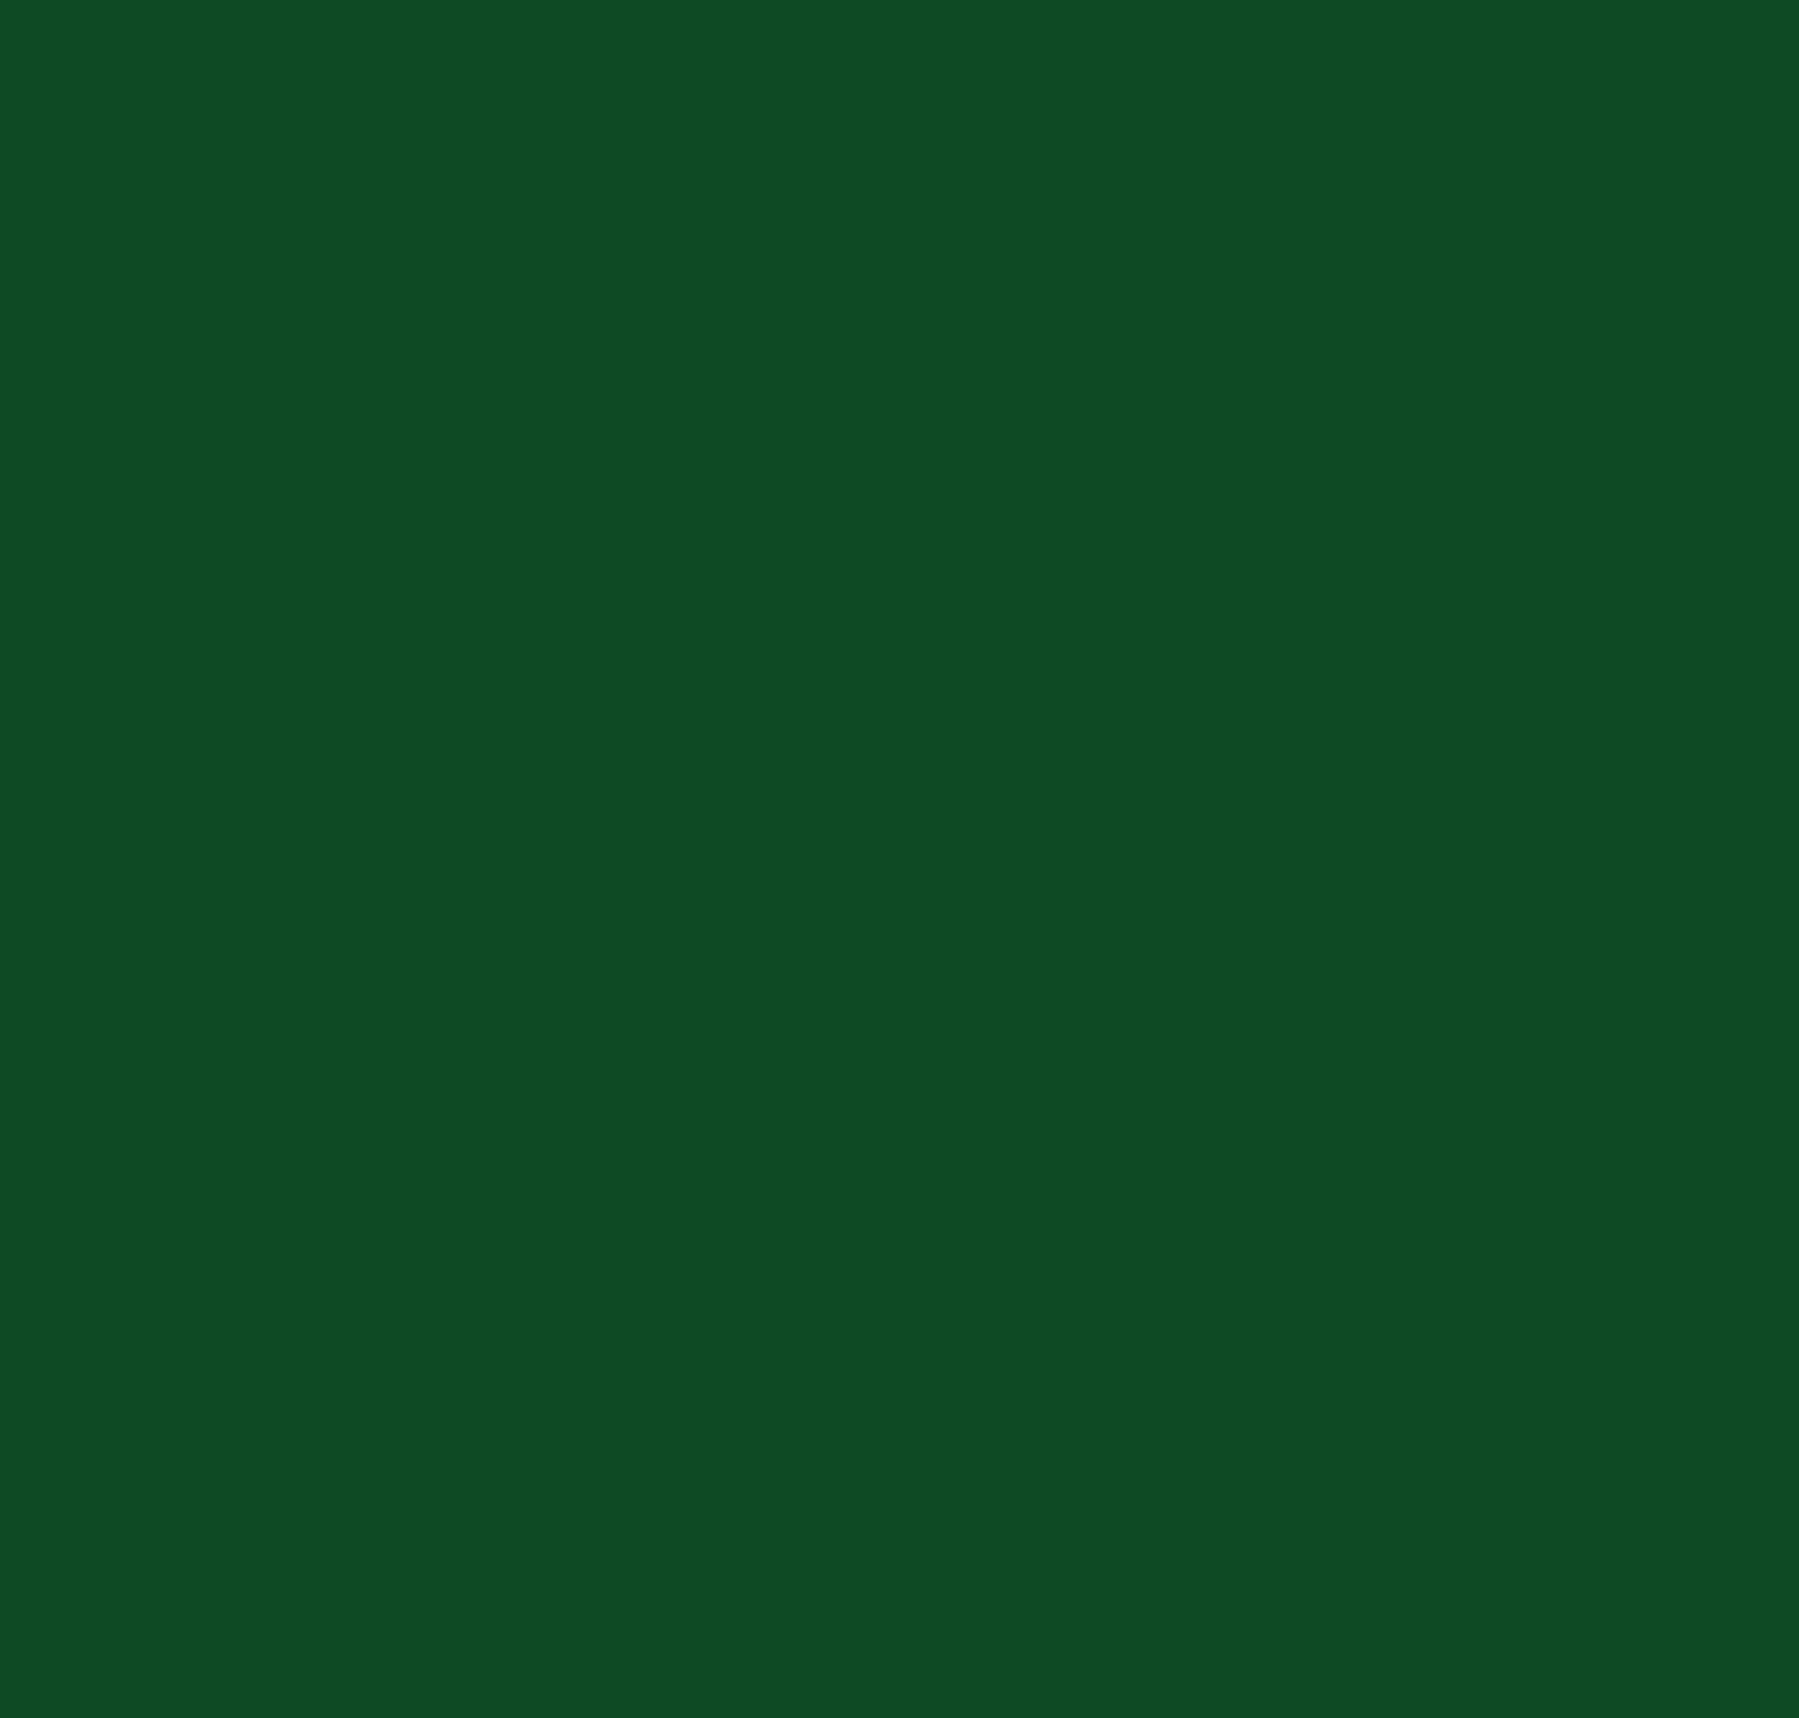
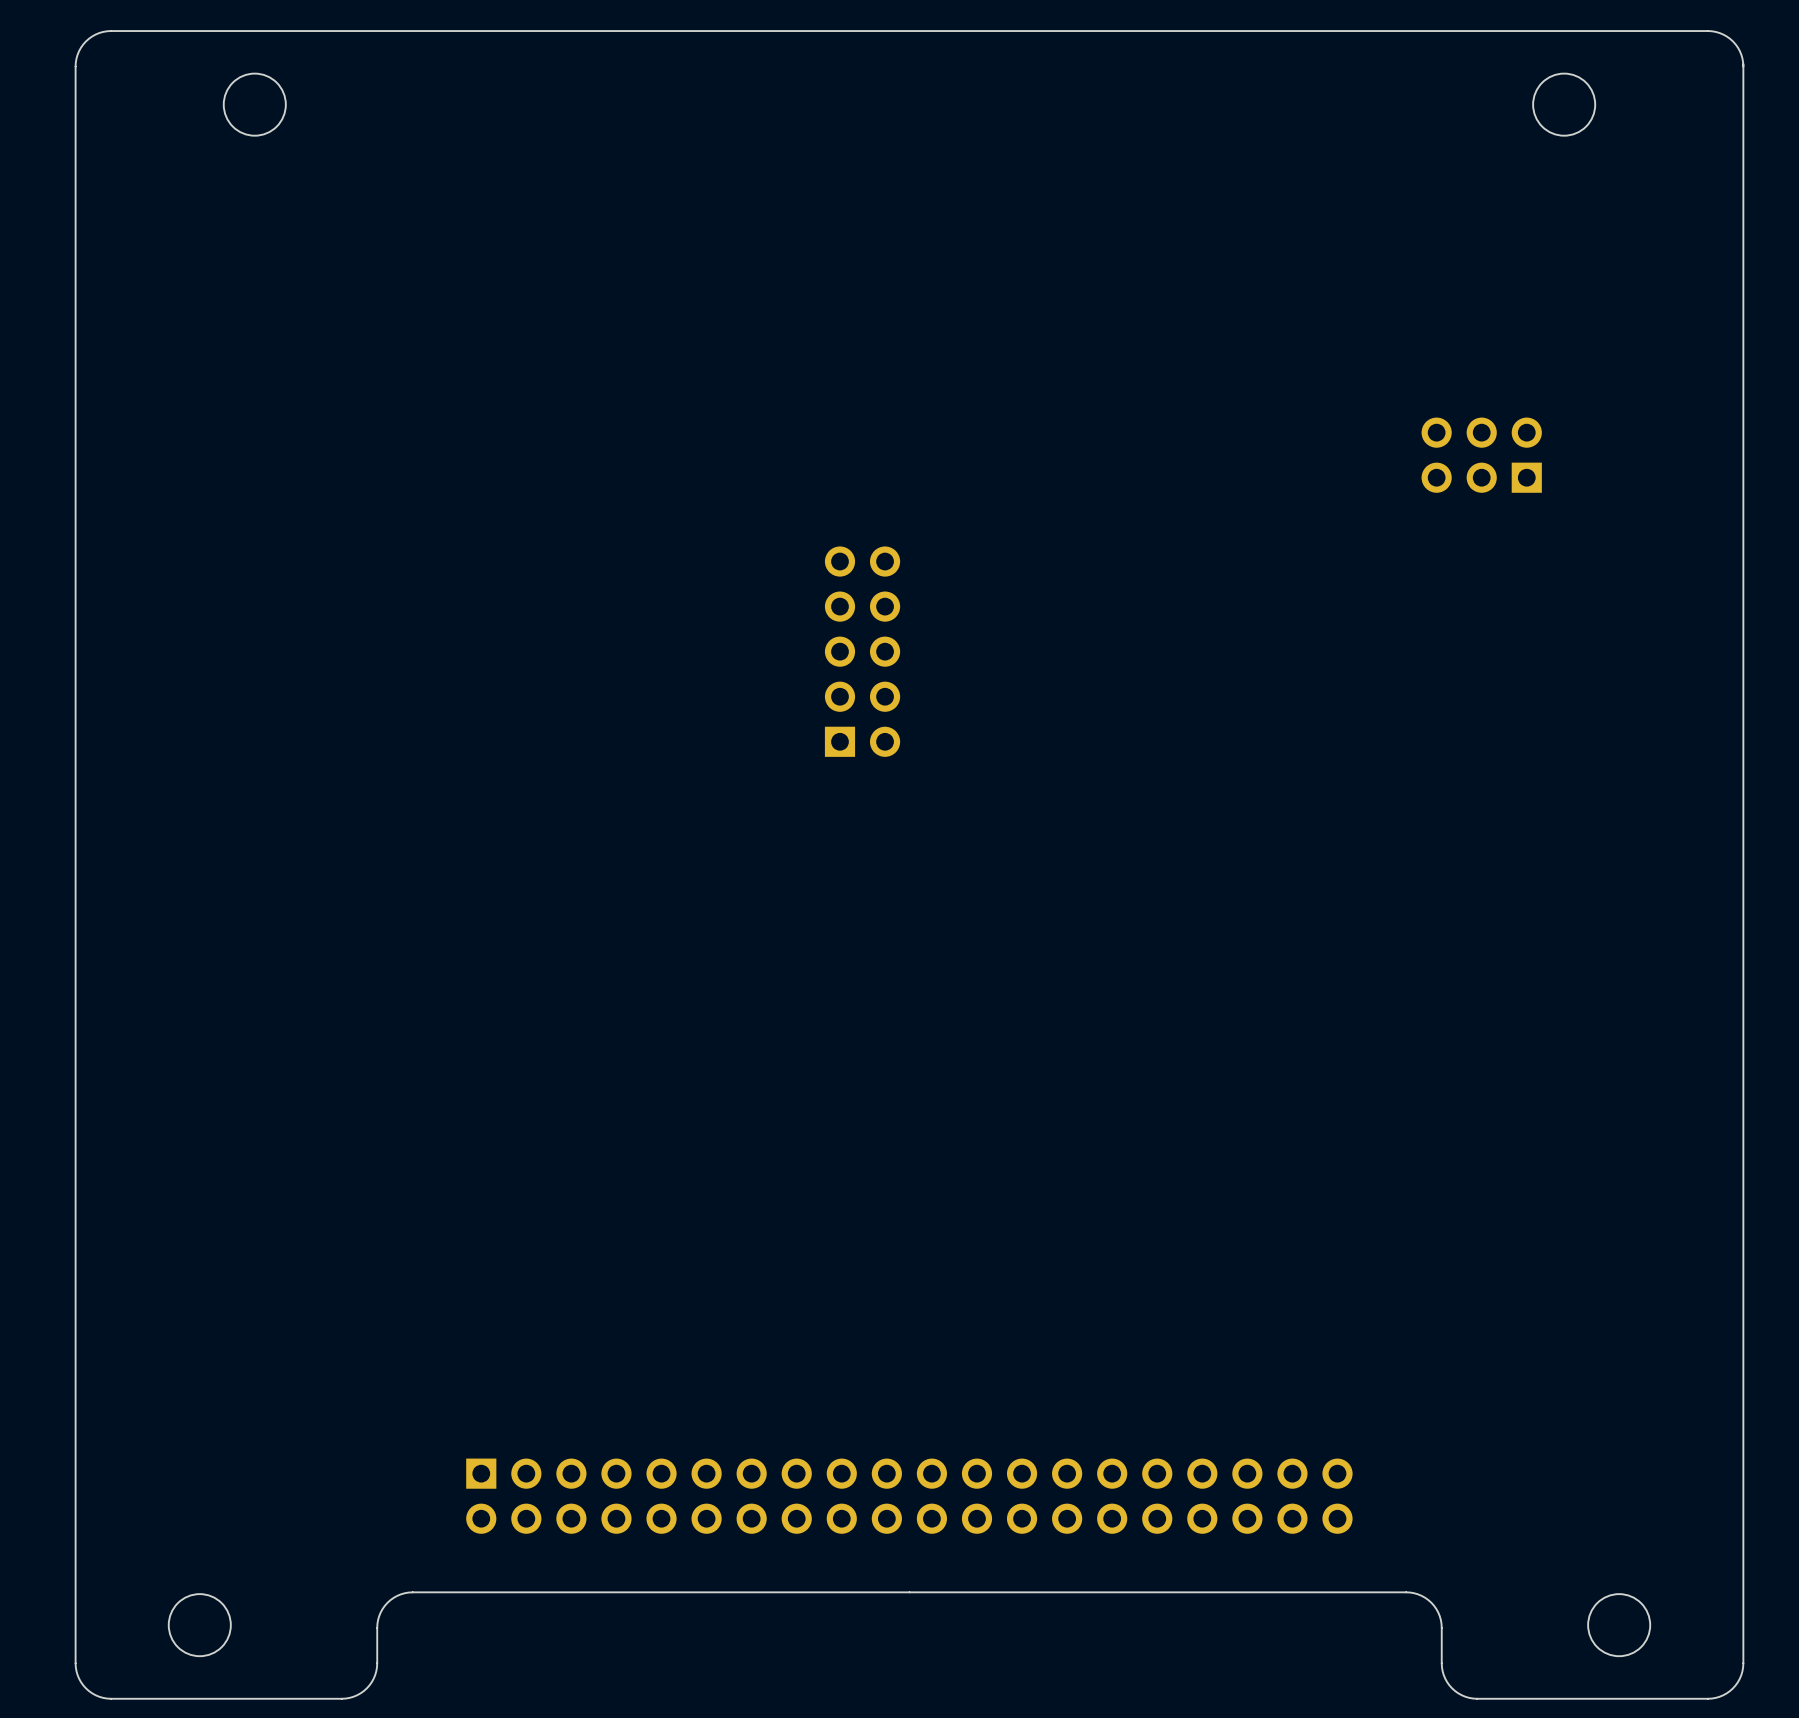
board edge: none -> (1743, 64) (1743, 1663) (1739, 1678) (1732, 1688) (1723, 1695) (1707, 1698) (1477, 1698) (1465, 1696) (1452, 1688) (1443, 1675) (1441, 1623) (1438, 1612) (1425, 1597) (1410, 1592) (412, 1592) (393, 1597) (382, 1608) (377, 1623) (375, 1675) (366, 1688) (353, 1696) (341, 1698) (111, 1698) (95, 1695) (85, 1688) (77, 1675) (75, 1663) (75, 66) (79, 51) (85, 41) (95, 34) (111, 31) (1707, 31) (1719, 33) (1732, 41) (1739, 51) (1742, 58) (1743, 62) (1743, 66)
round board edge: none -> [222, 72, 287, 137]
round board edge: none -> [1532, 72, 1597, 137]
part: none -> (1481, 455)
part: none -> (862, 651)
part: none -> (909, 1496)
round board edge: none -> [167, 1593, 232, 1658]
round board edge: none -> [1587, 1593, 1652, 1658]

